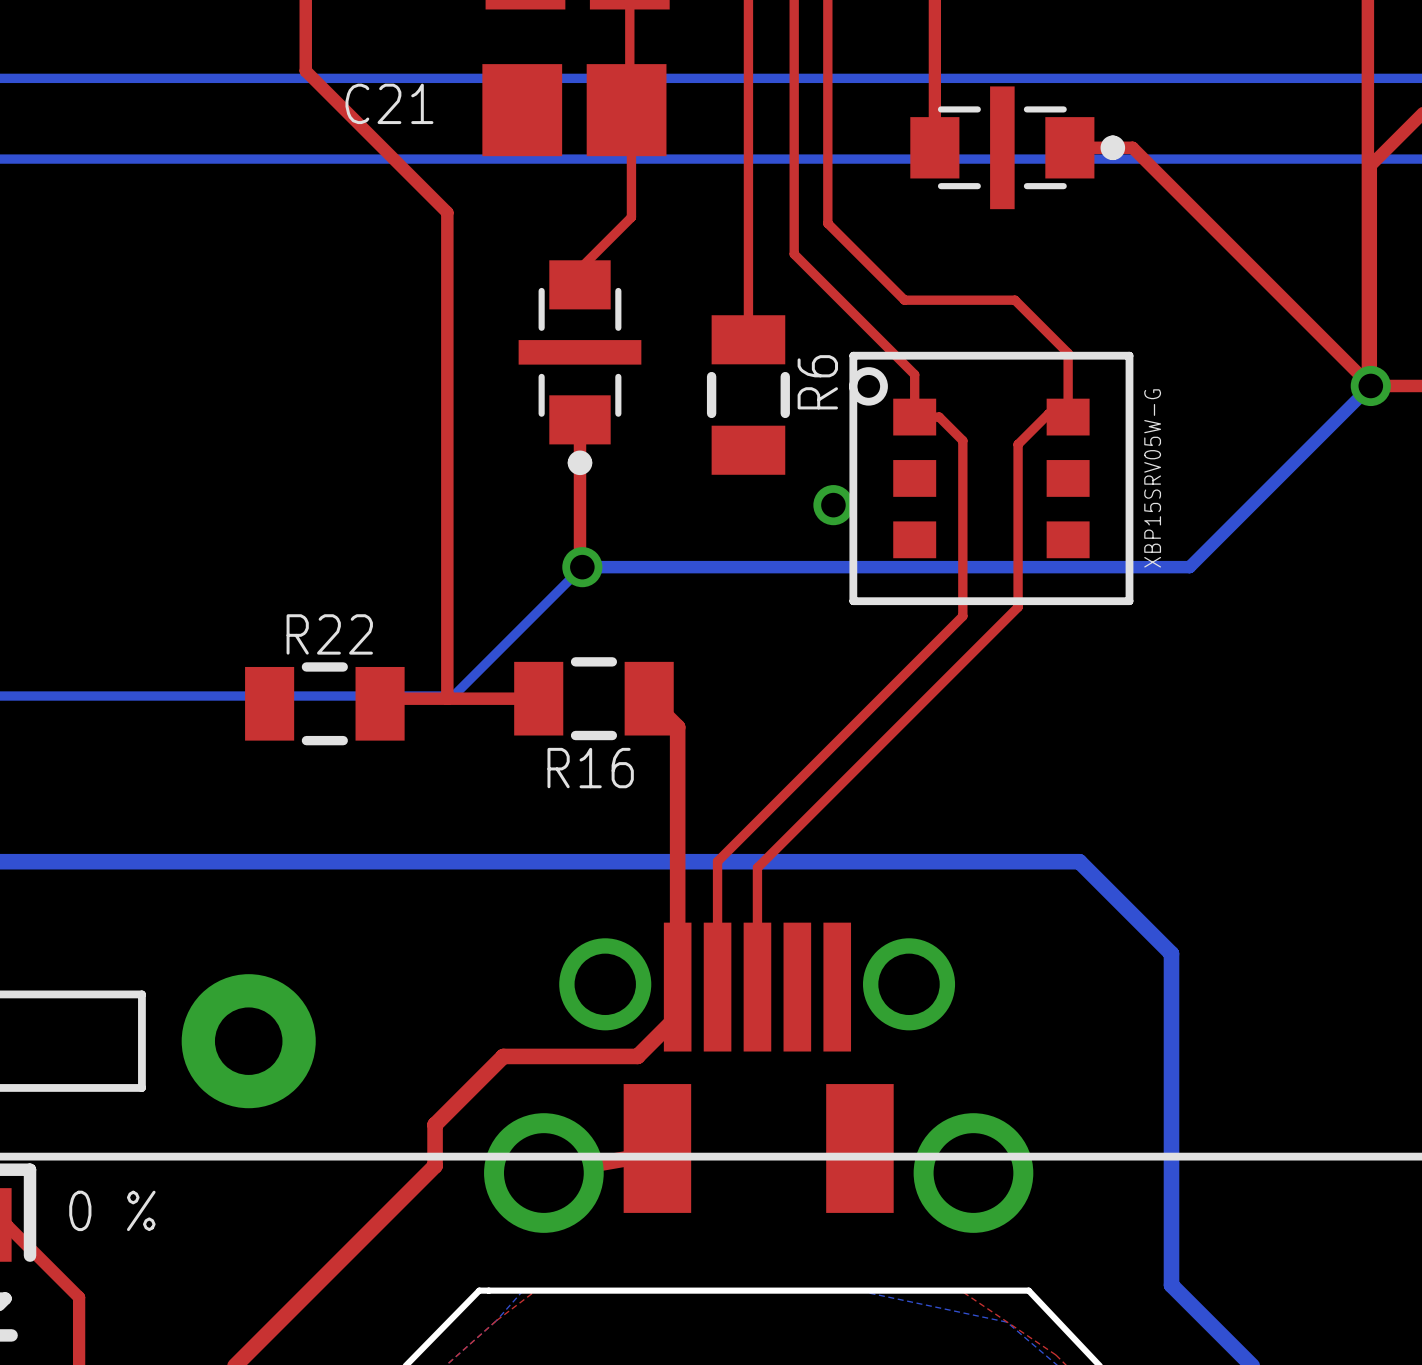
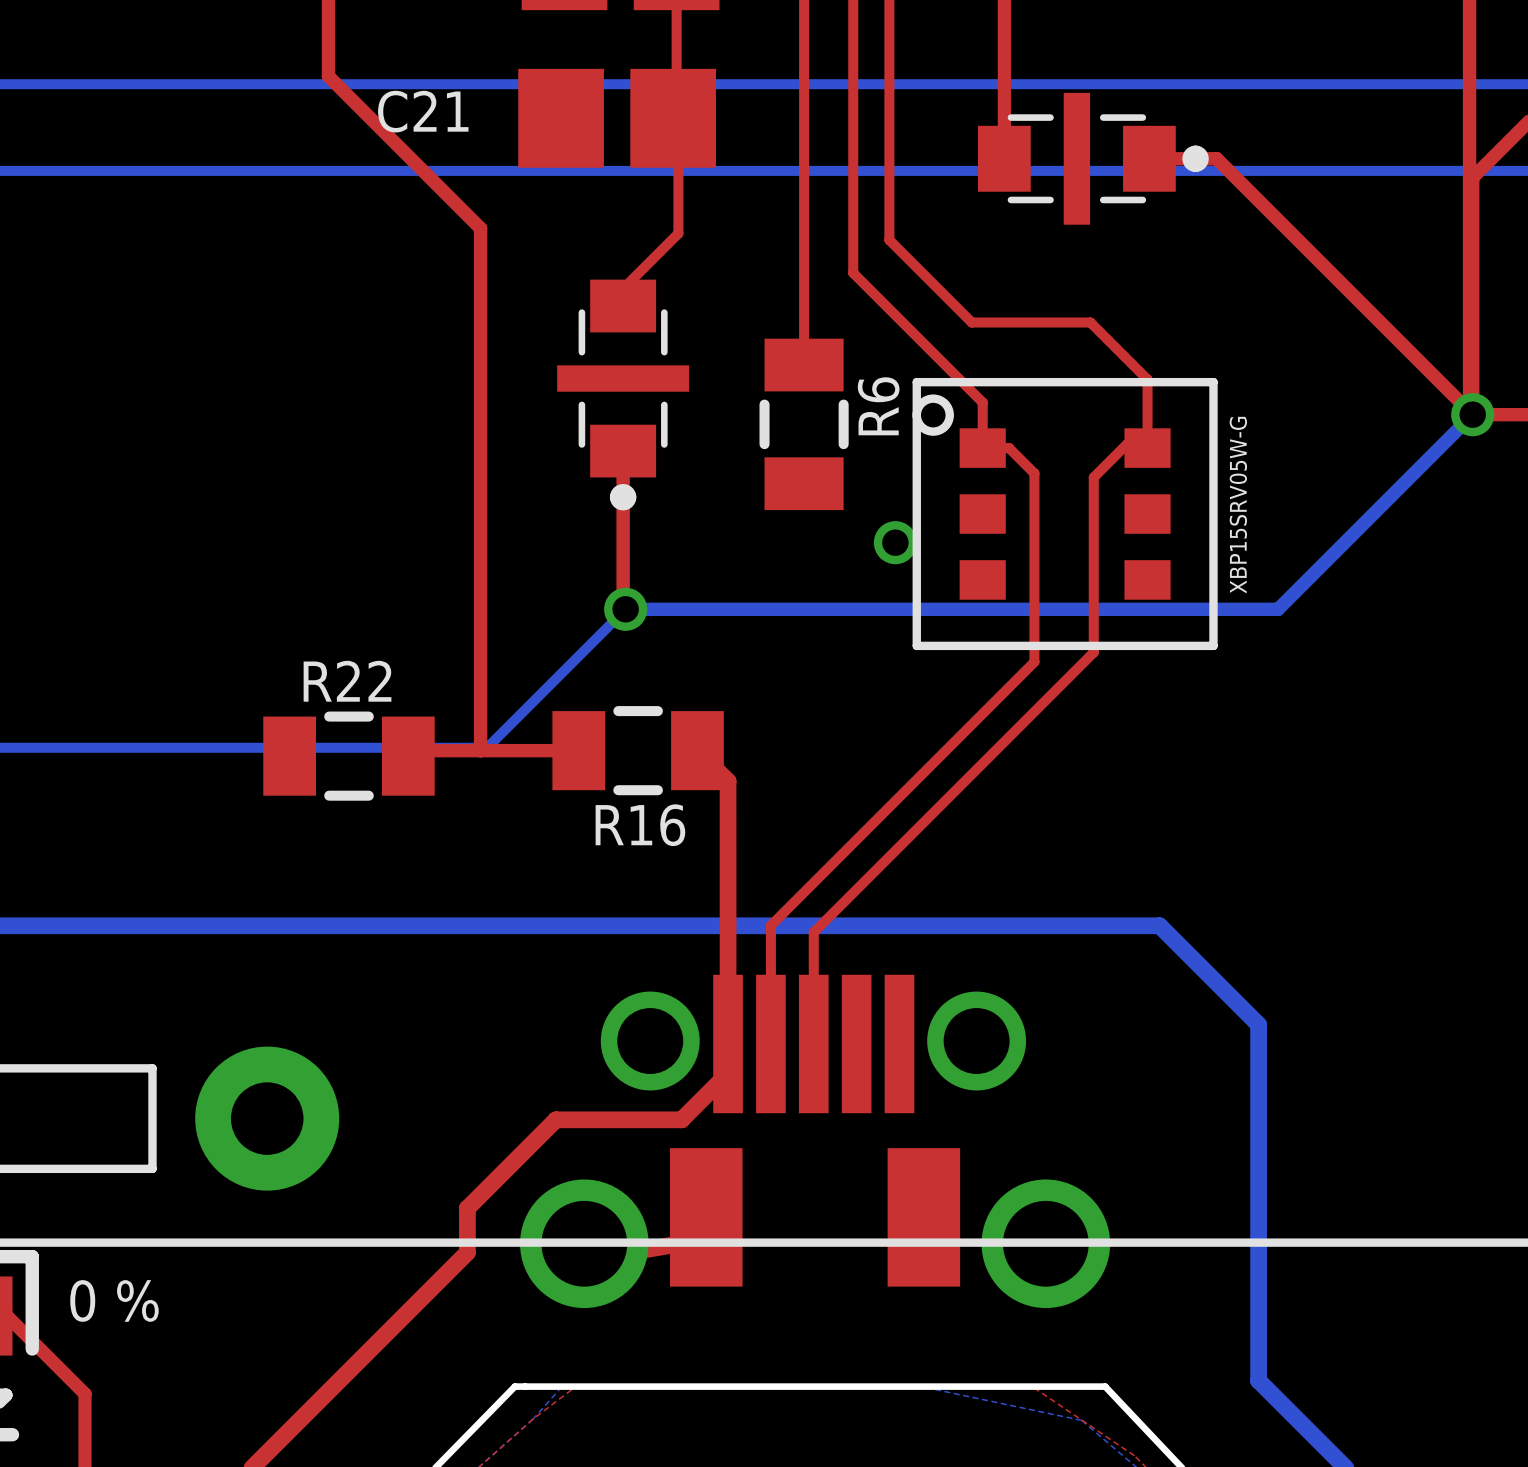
top track: (677, 999) (677, 1016) (637, 1056) (503, 1056) -> (728, 1073) (681, 1119) (555, 1119) (540, 1134)
part position: (758, 1077) -> (815, 1141)

